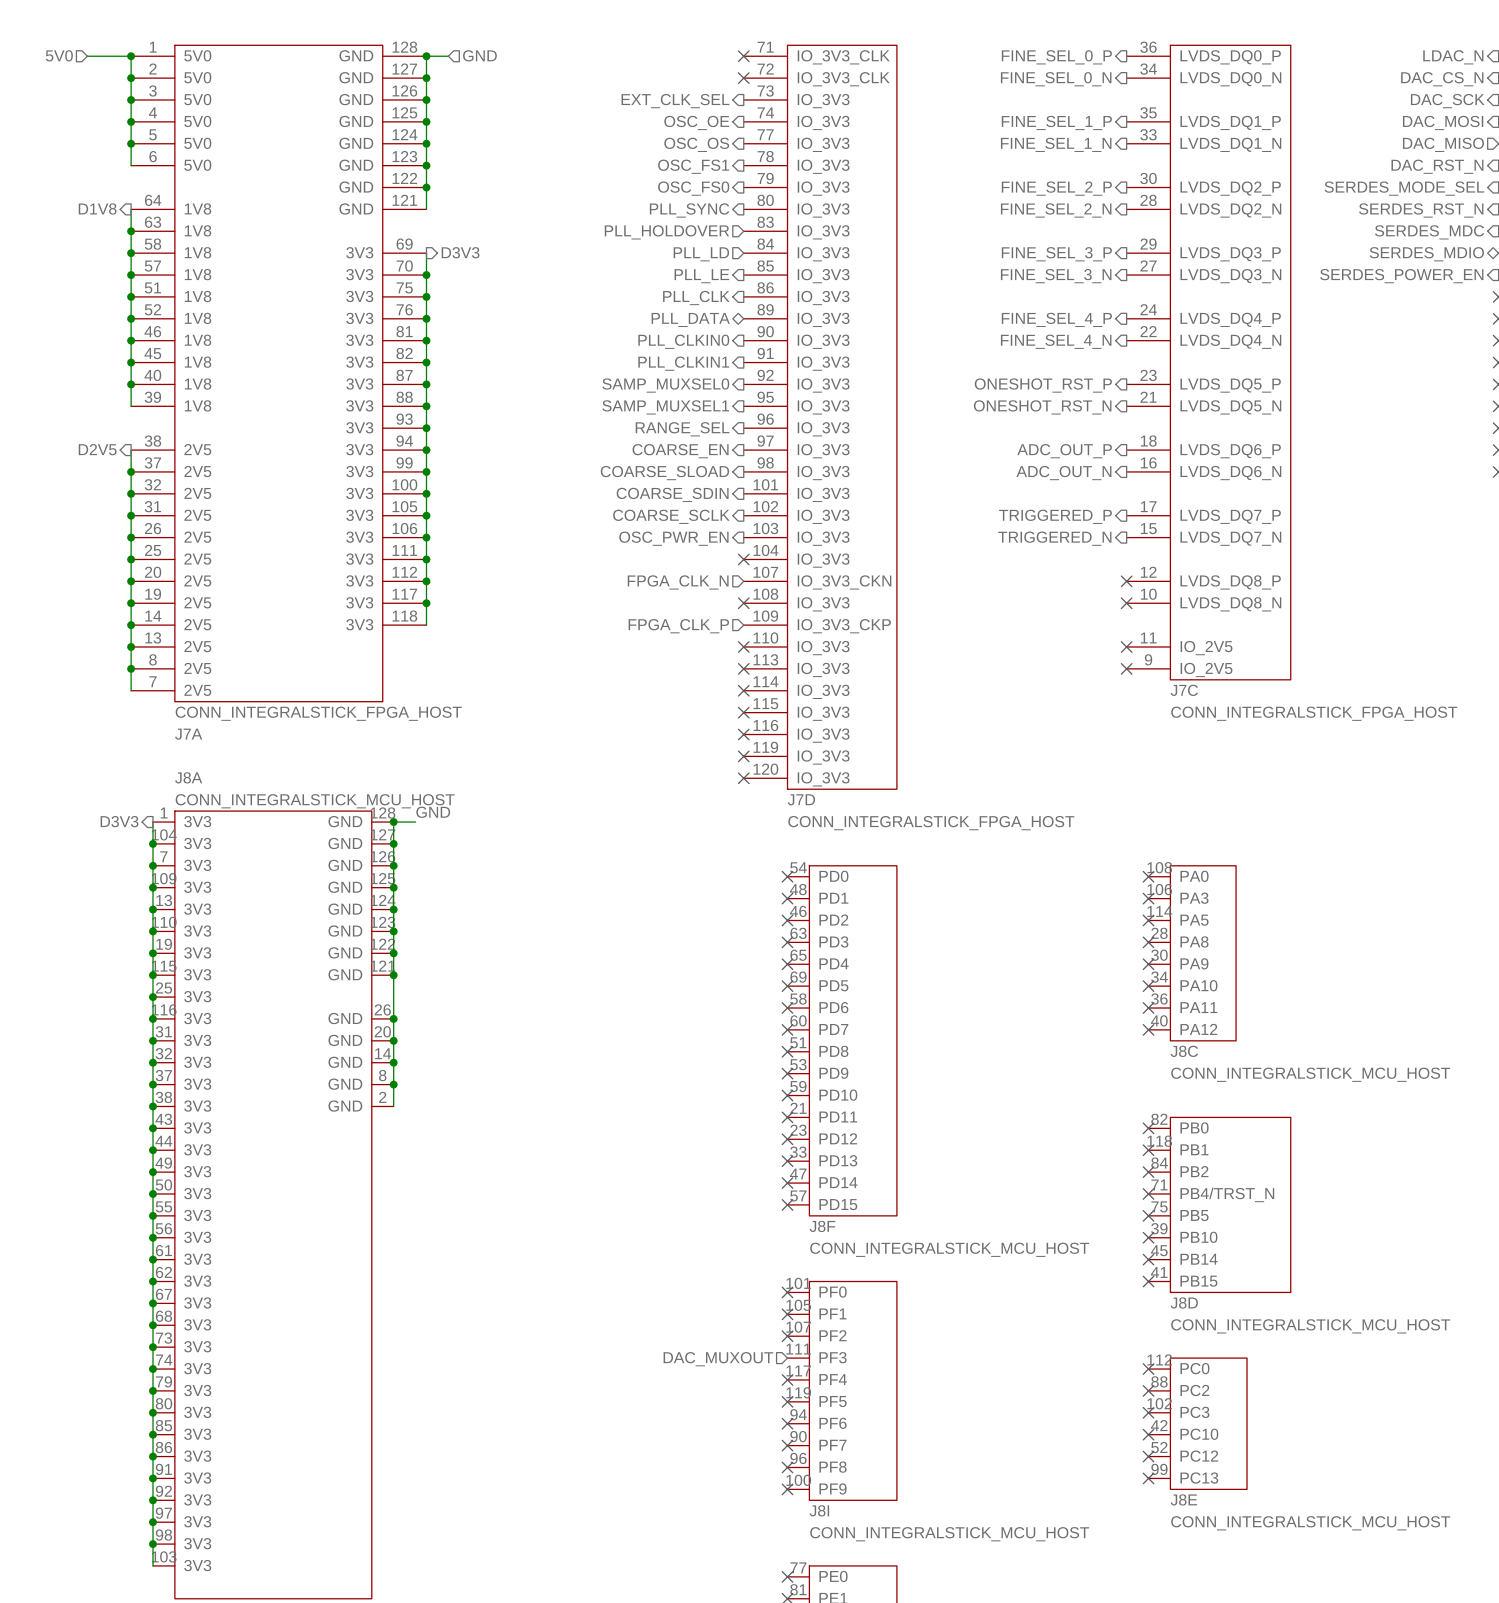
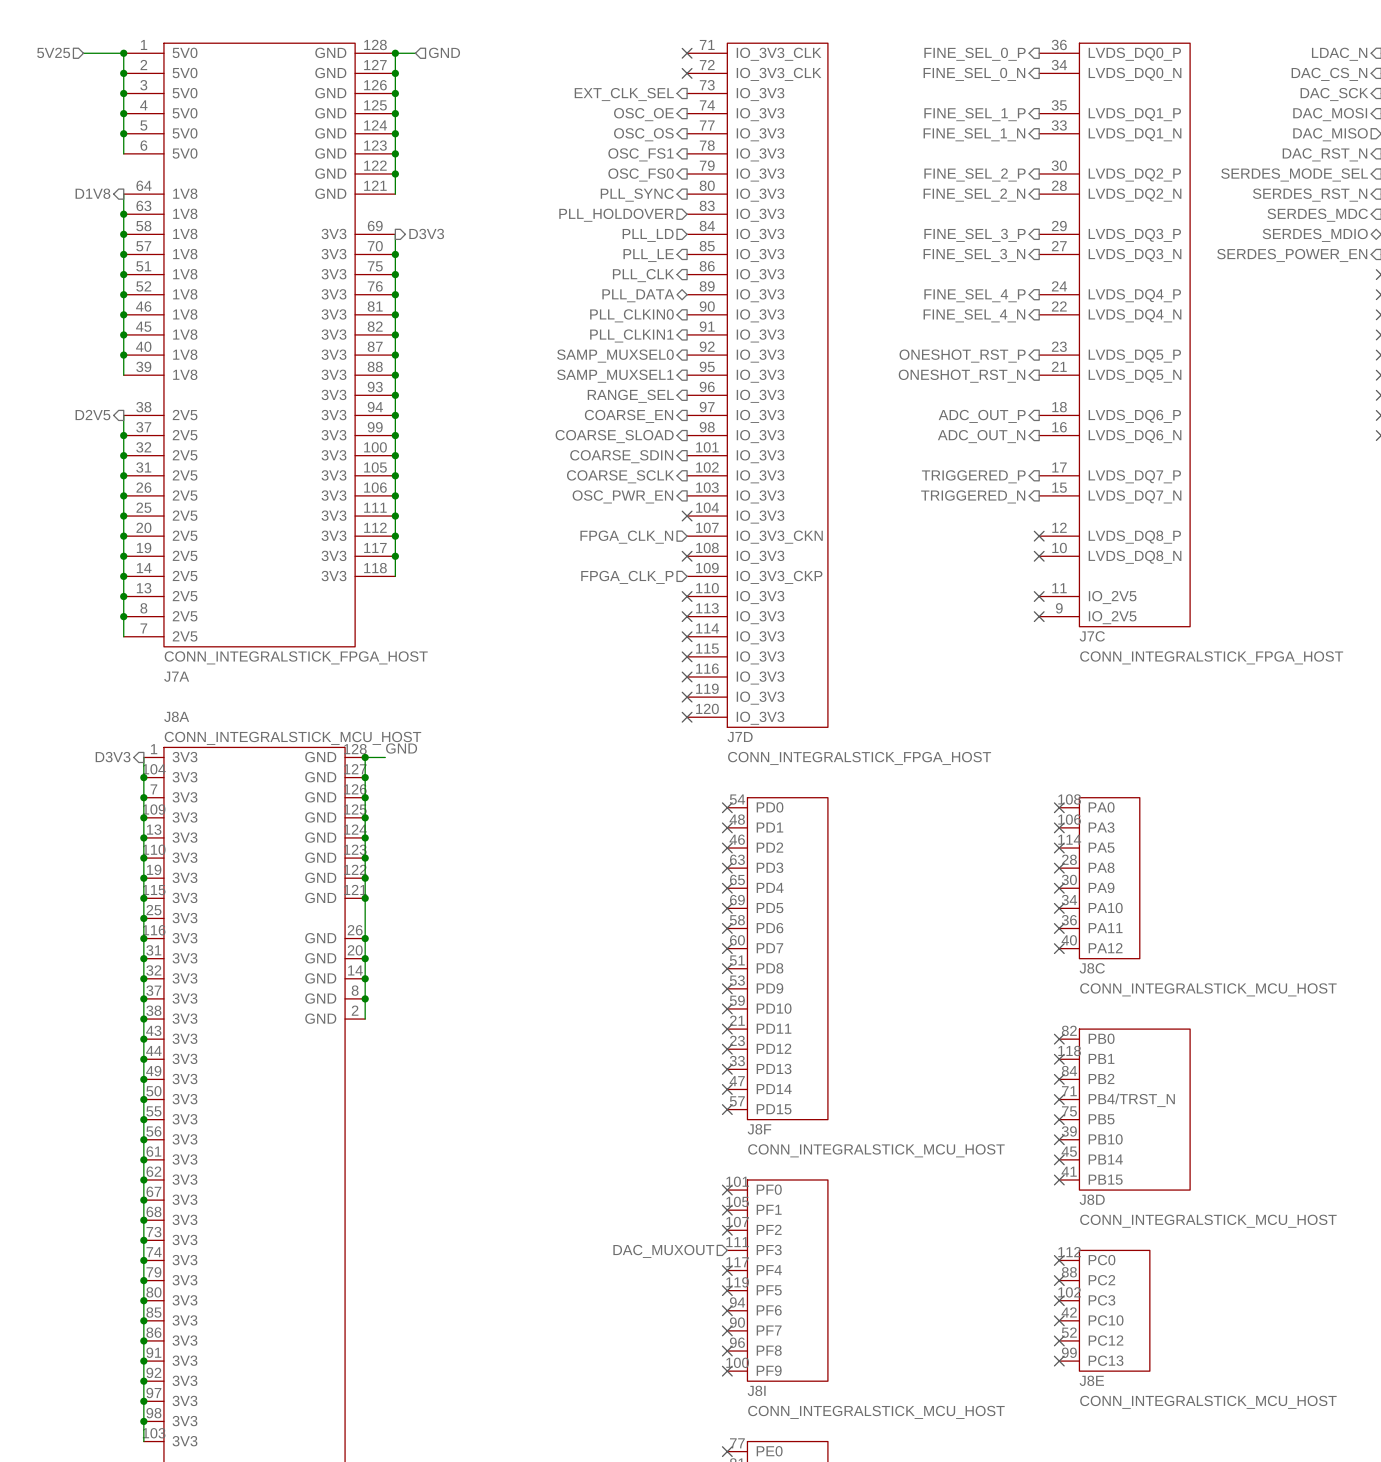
hierarchical label: 5V0 (59, 55) -> 5V25 (53, 52)

